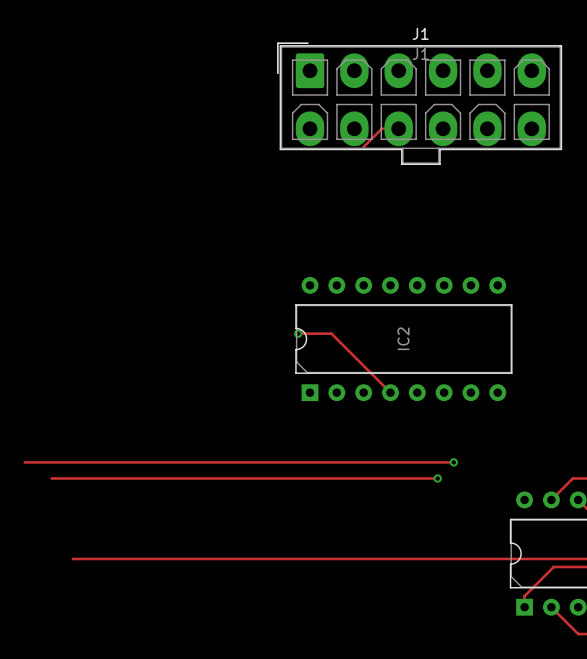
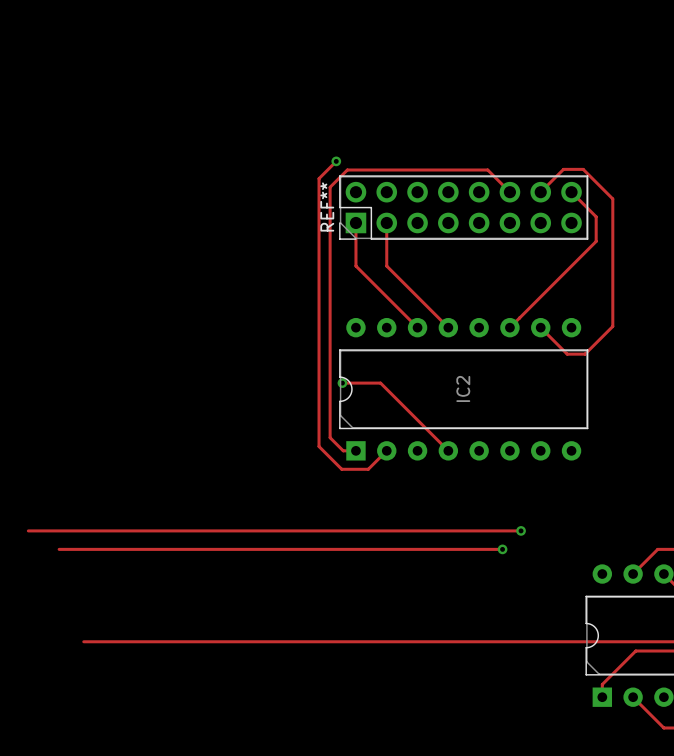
J1: (419, 103) -> none
track: (398, 128) (381, 128) (363, 146) -> none
track: none -> (336, 161) (319, 178) (319, 446) (341, 469) (368, 469) (386, 450)
via: none -> (336, 161)
track: none -> (509, 192) (487, 170) (347, 170) (330, 187) (330, 437) (343, 450) (355, 450)
track: none -> (540, 192) (563, 169) (583, 169) (612, 198) (612, 326) (585, 354) (567, 354) (540, 327)
track: none -> (571, 192) (596, 216) (596, 241) (509, 327)
REF**: none -> (463, 207)
track: none -> (355, 222) (355, 266) (417, 327)
track: none -> (386, 222) (386, 266) (448, 327)

